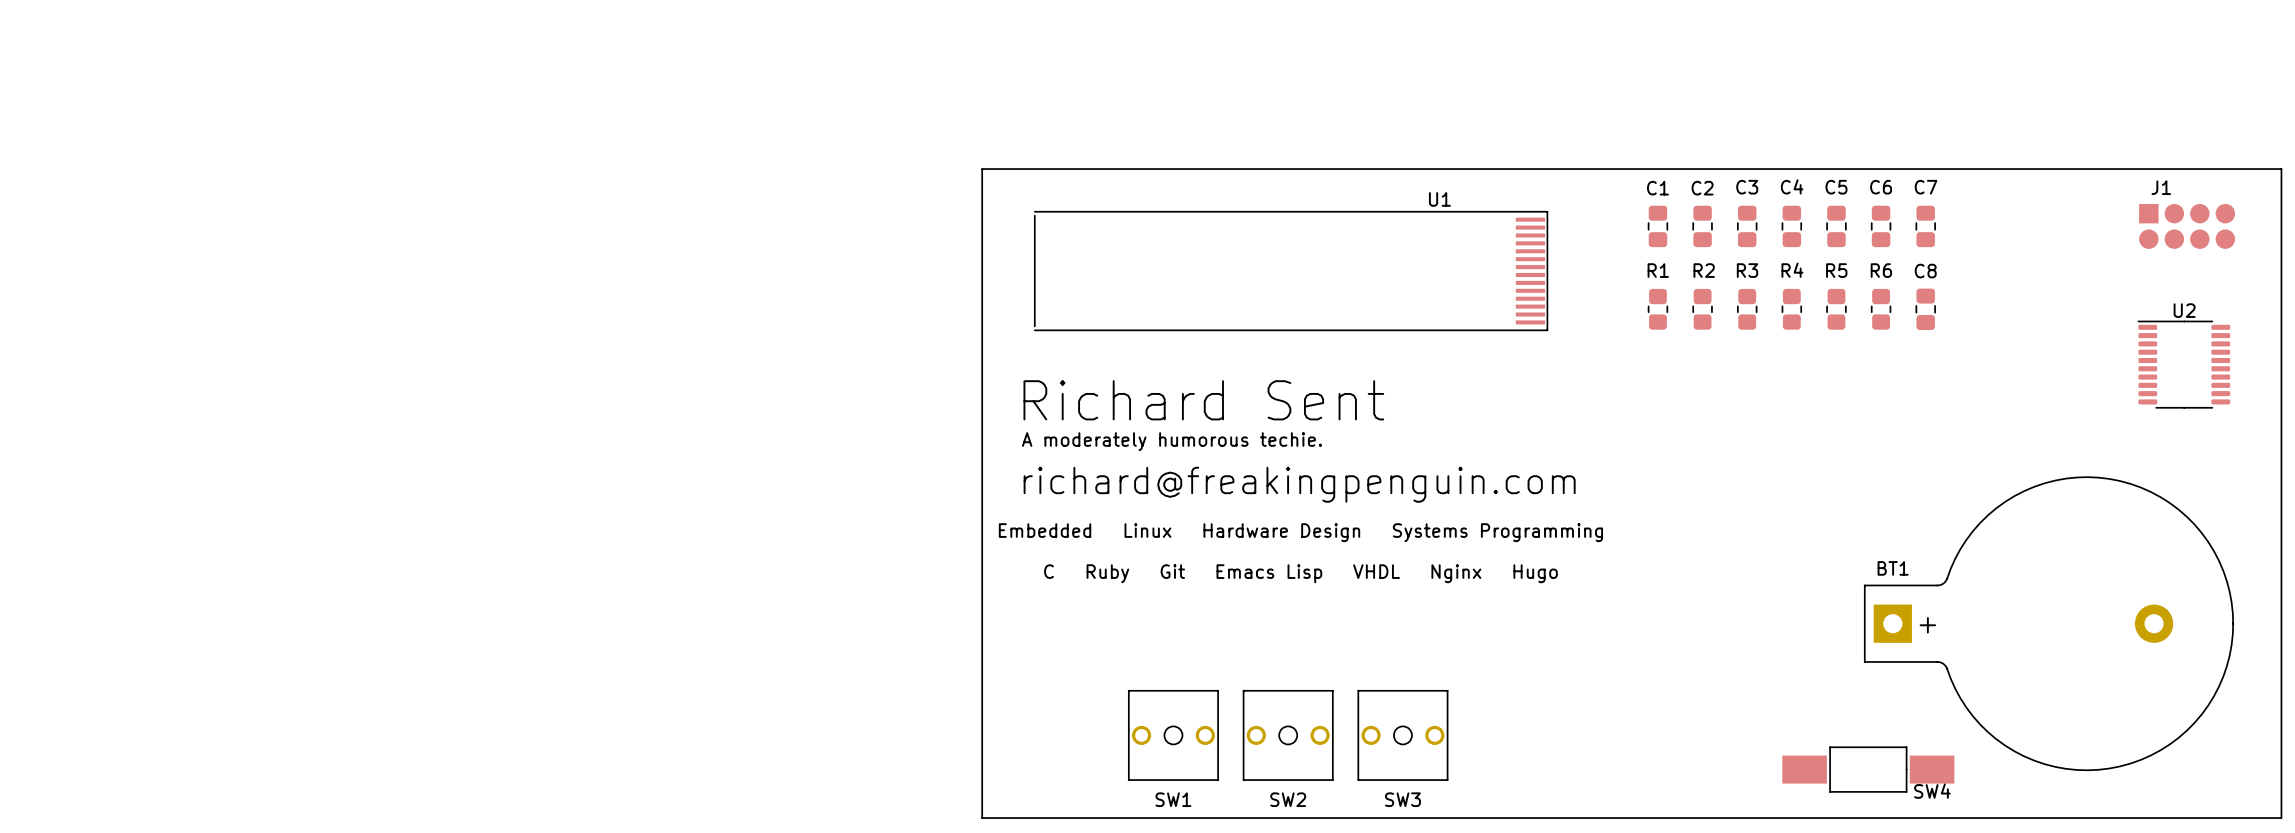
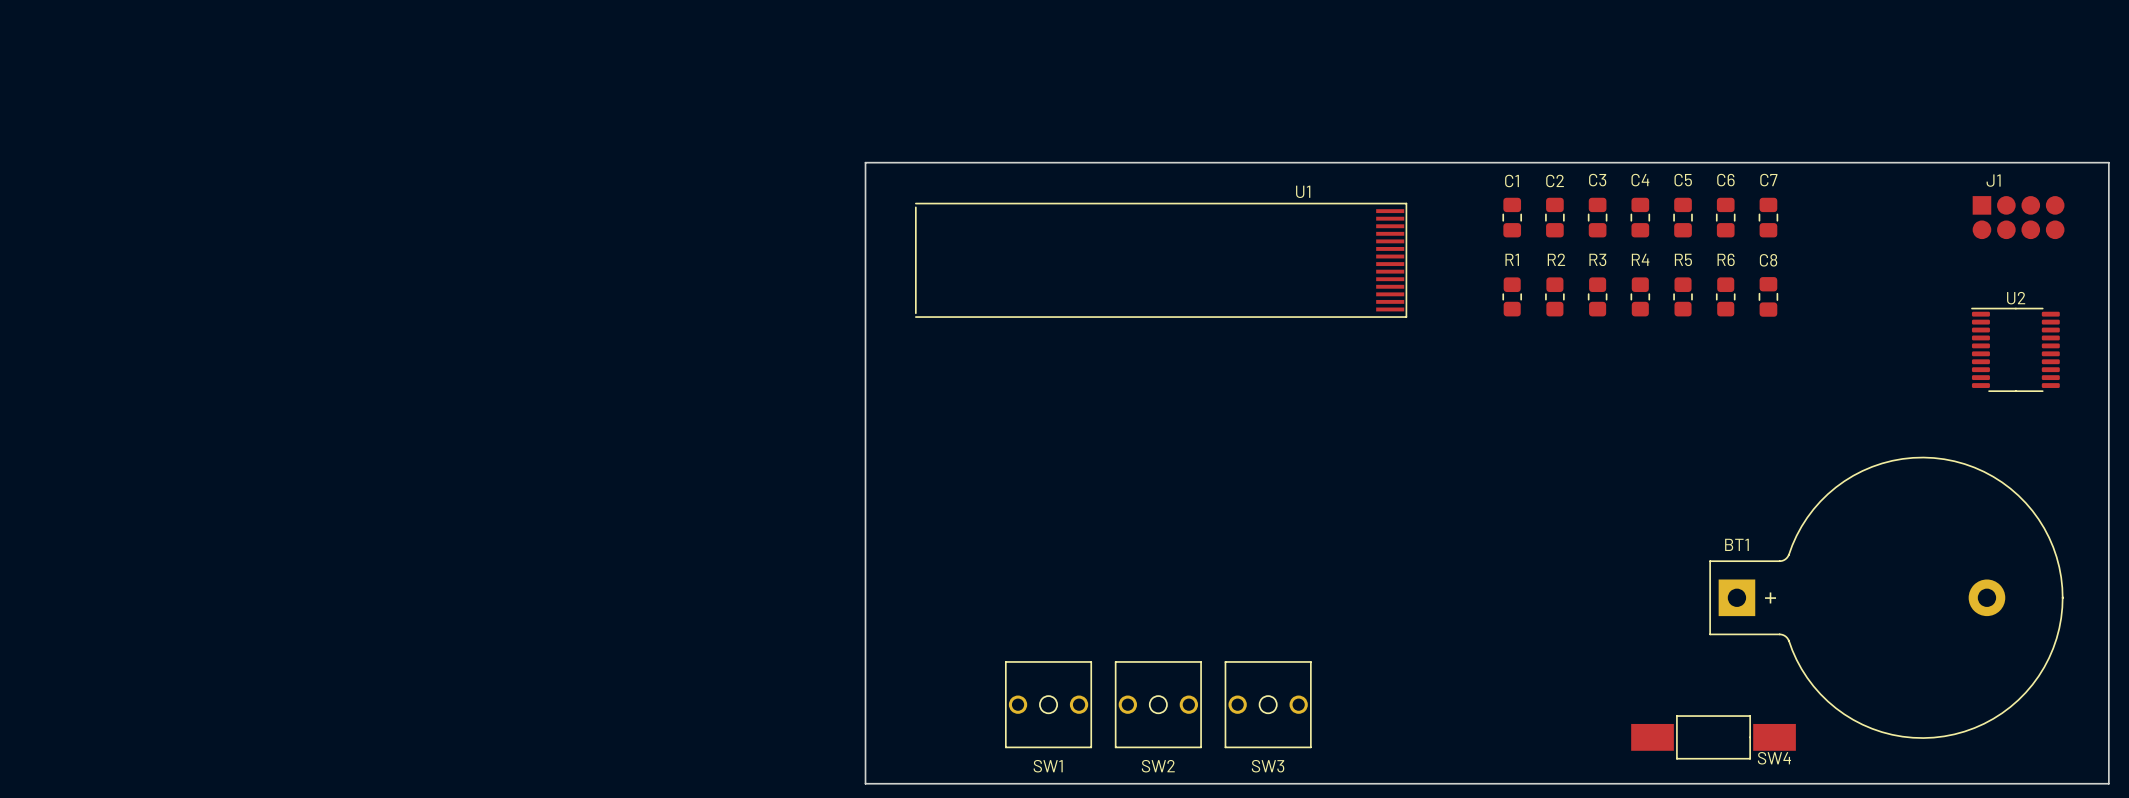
text: Richard Sent (1203, 400) -> none
text: A moderately humorous techie. (1171, 441) -> none
text: richard@freakingpenguin.com (1299, 484) -> none
text: Embedded Linux Hardware Design Systems Programming (1300, 532) -> none
text: C Ruby Git Emacs Lisp VHDL Nginx Hugo (1300, 573) -> none

